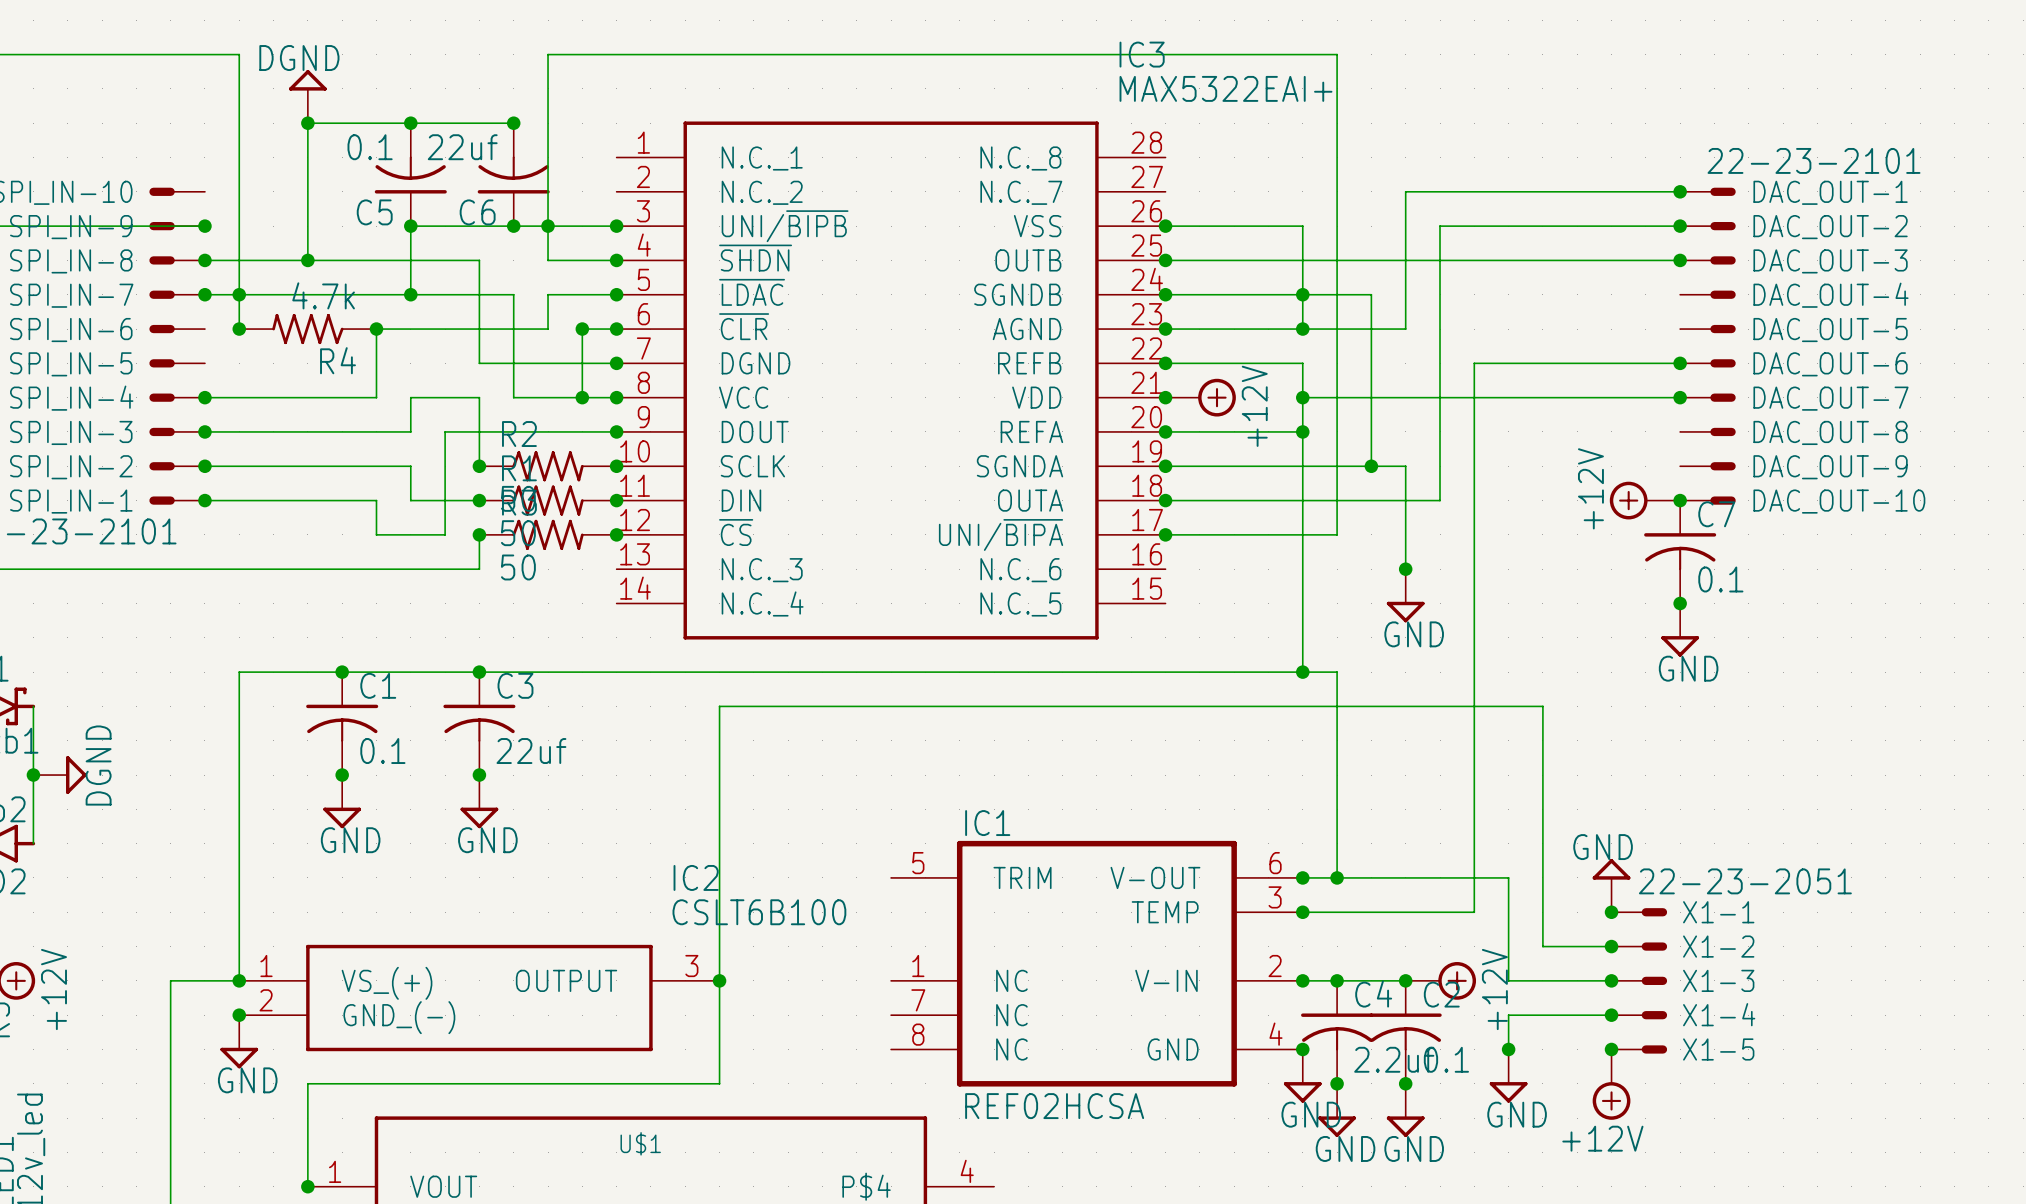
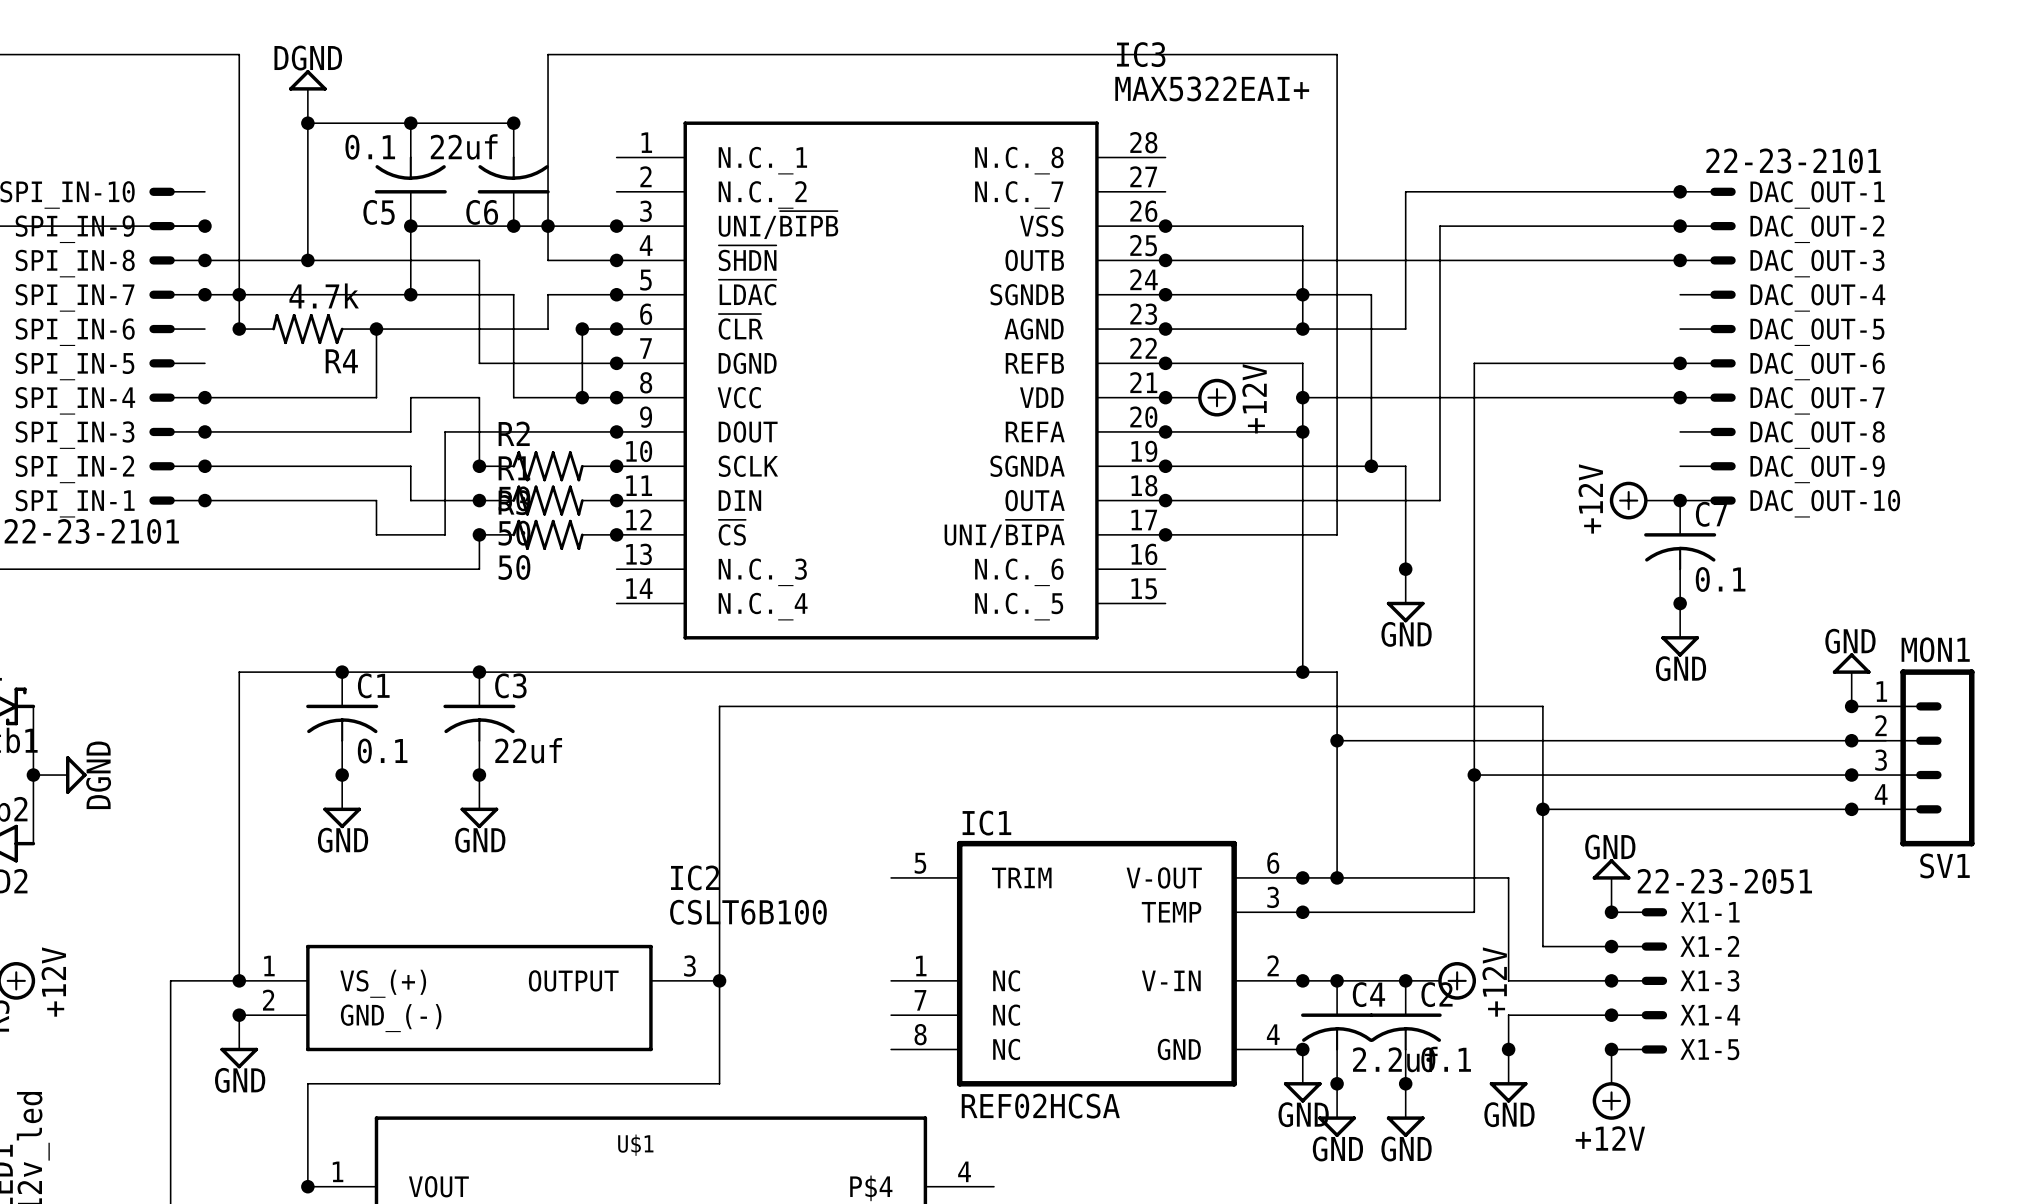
power symbol: none -> GND (1851, 679)
junction: none -> (1851, 706)
wire: none -> (1337, 740) (1885, 740)
junction: none -> (1337, 740)
junction: none -> (1851, 740)
SV1: none -> MON1 (1913, 757)
wire: none -> (1474, 775) (1851, 775)
junction: none -> (1474, 775)
junction: none -> (1851, 775)
wire: none -> (1542, 809) (1851, 809)
junction: none -> (1542, 809)
junction: none -> (1851, 809)

